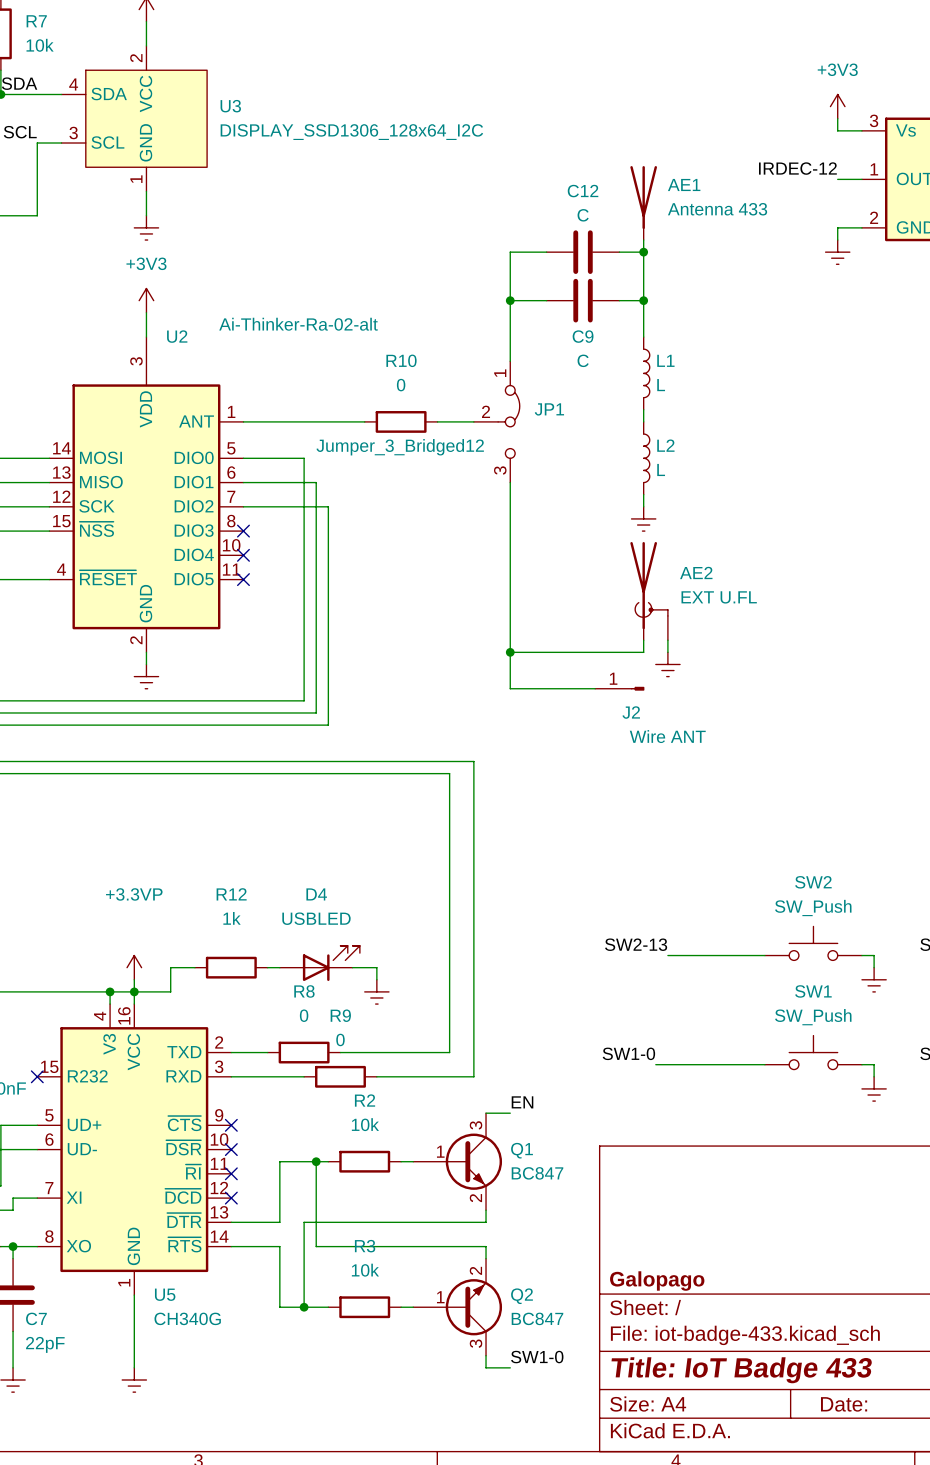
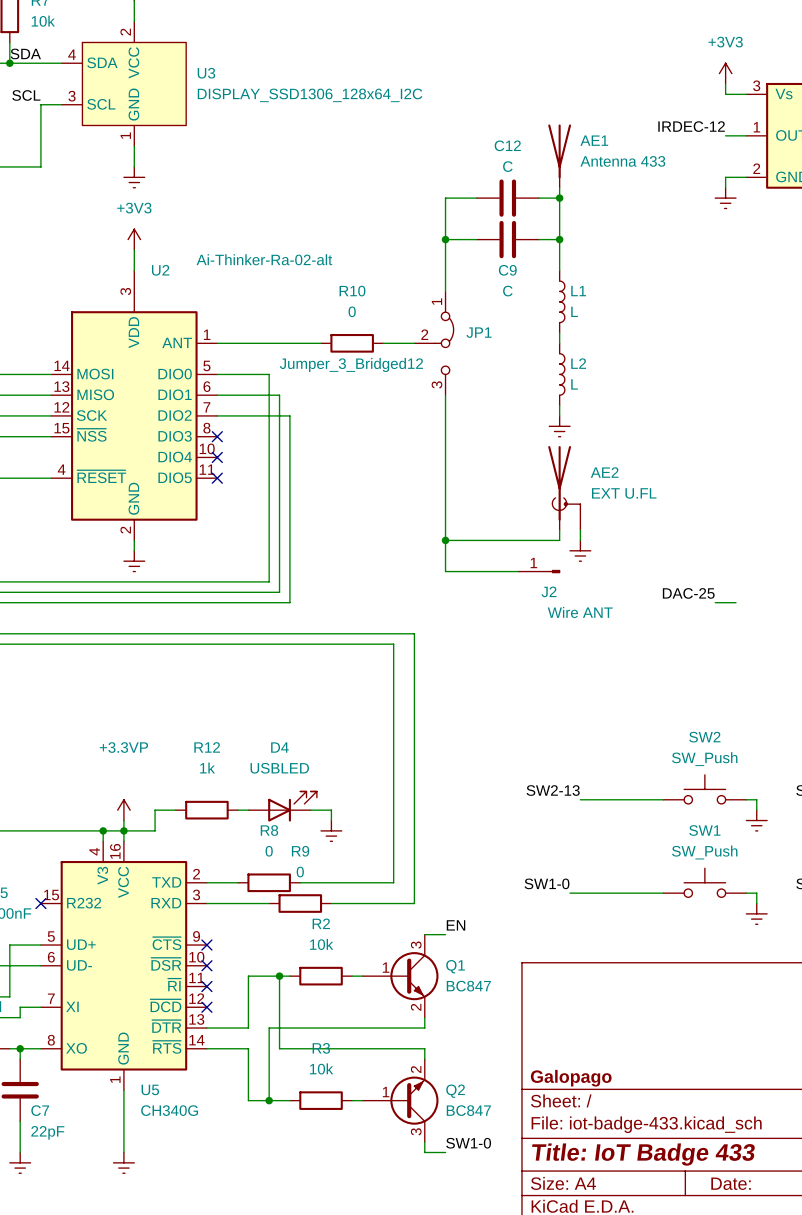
label: none -> DAC-25 (688, 593)
wire: none -> (715, 602) (736, 602)

